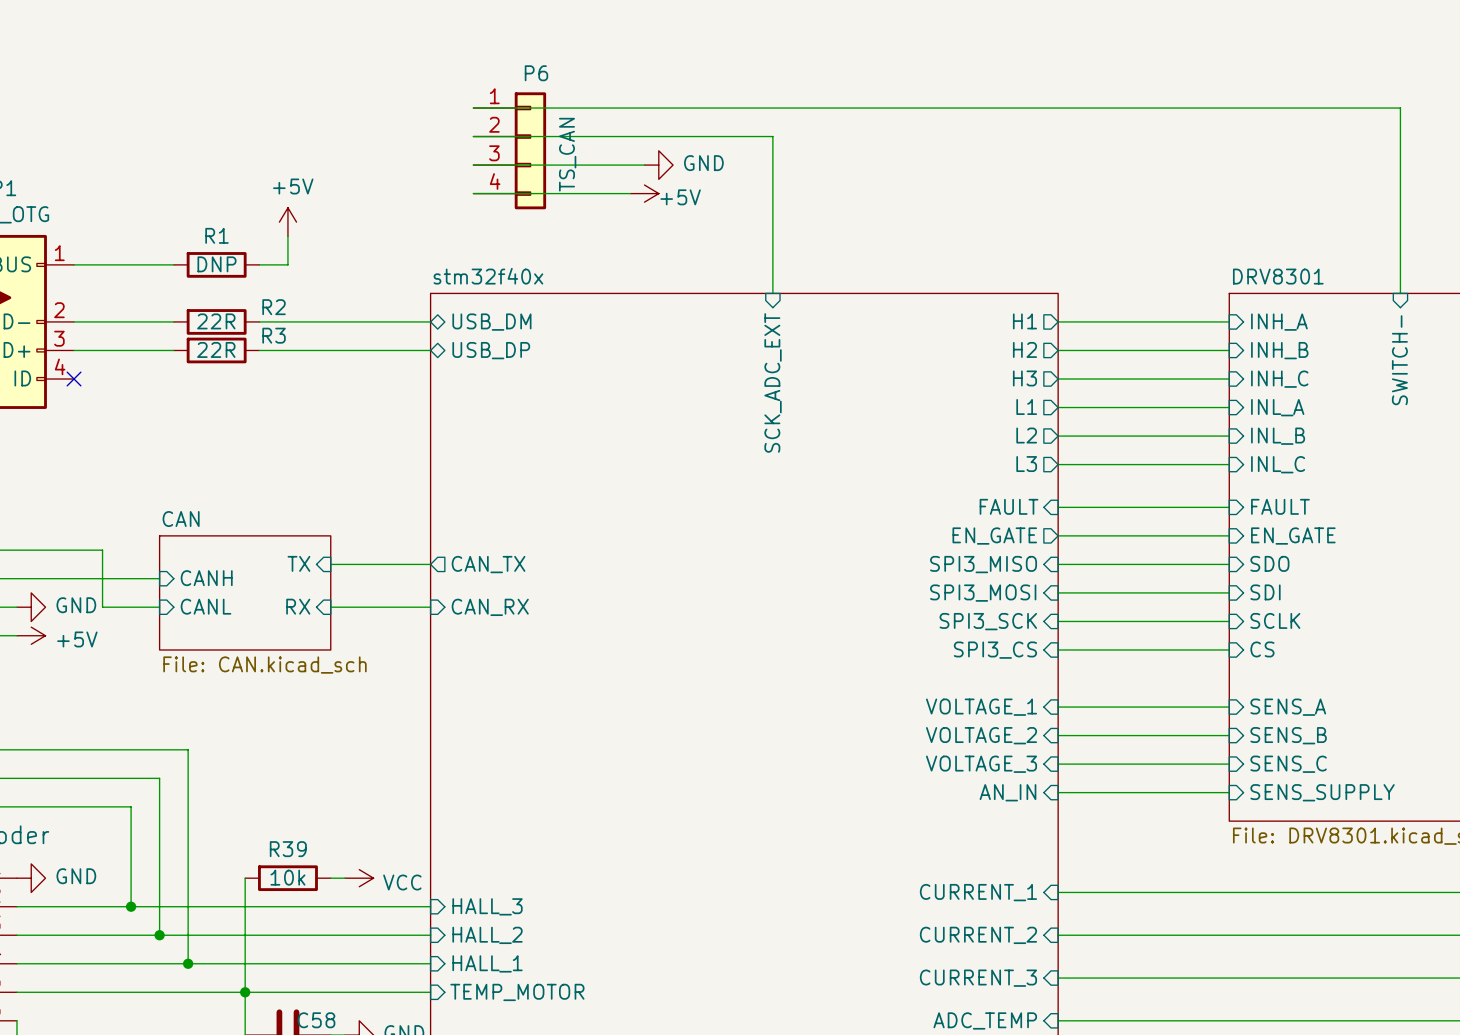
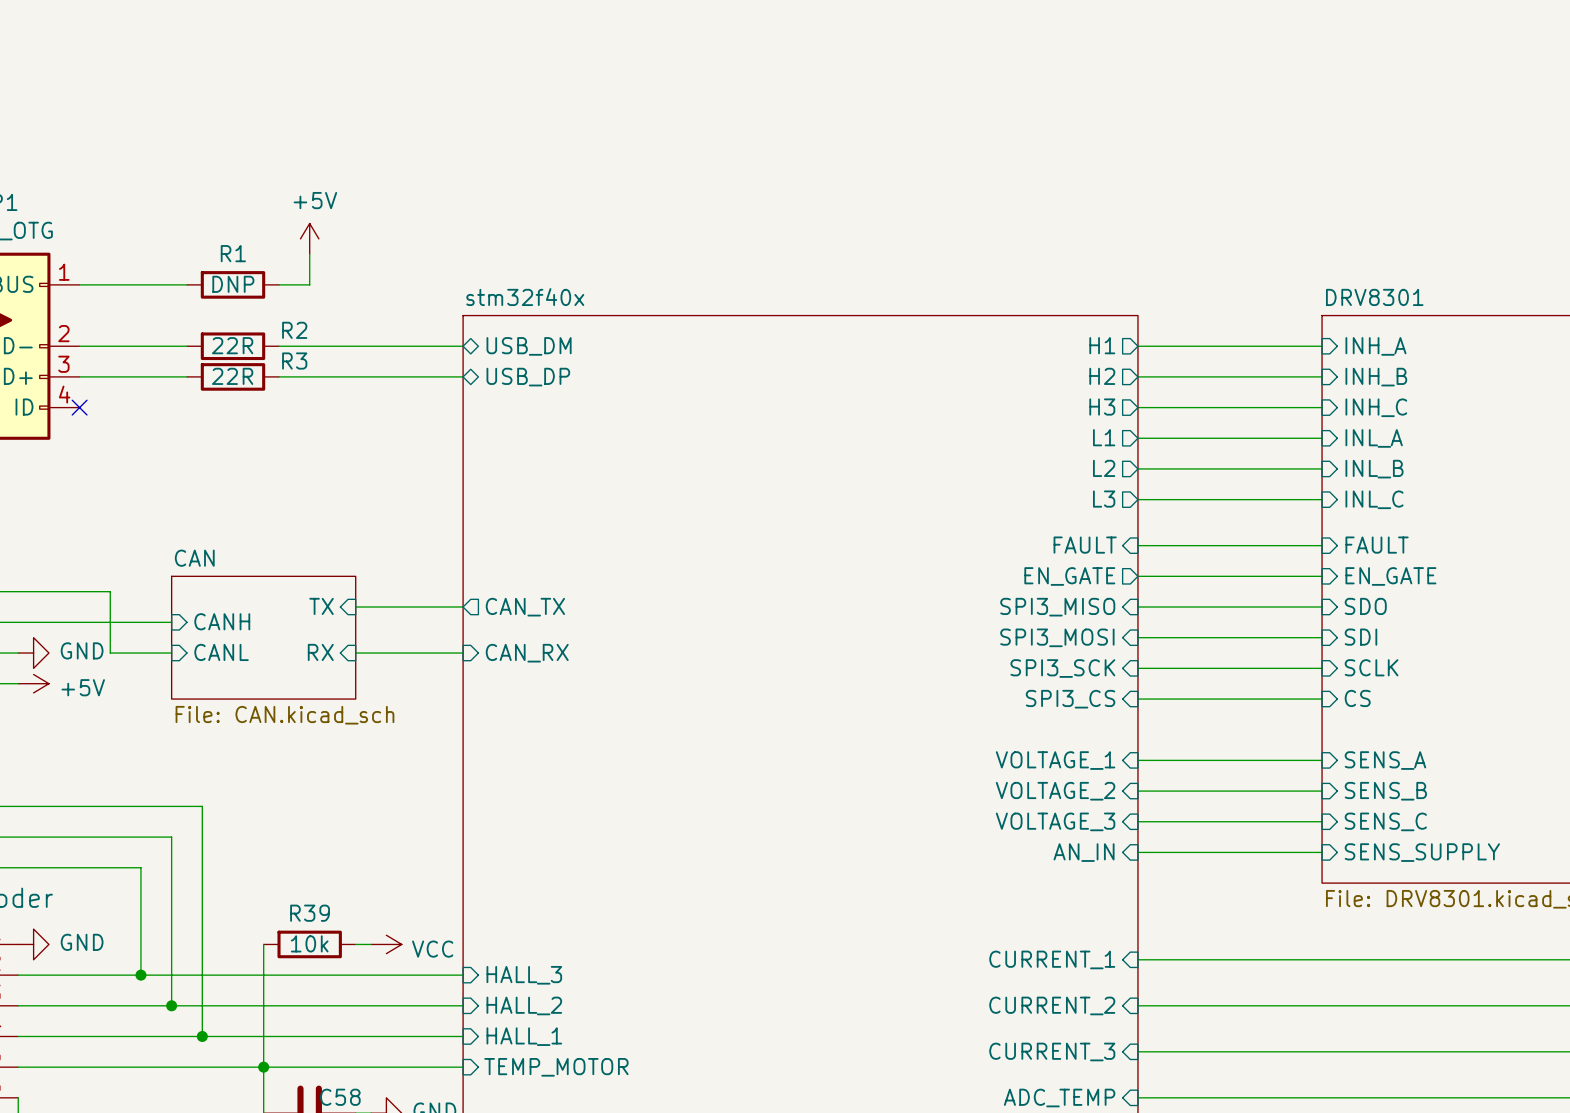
wire: (473, 108) (1400, 108) (1400, 293) -> none
wire: (473, 136) (772, 136) (772, 293) -> none
P6: TS_CAN (509, 150) -> none
wire: (473, 165) (644, 165) -> none
power symbol: GND (658, 165) -> none
wire: (473, 193) (630, 193) -> none
power symbol: +5V (644, 193) -> none
sheet pin: SWITCH- (1399, 360) -> none
sheet pin: SCK_ADC_EXT (773, 382) -> none

